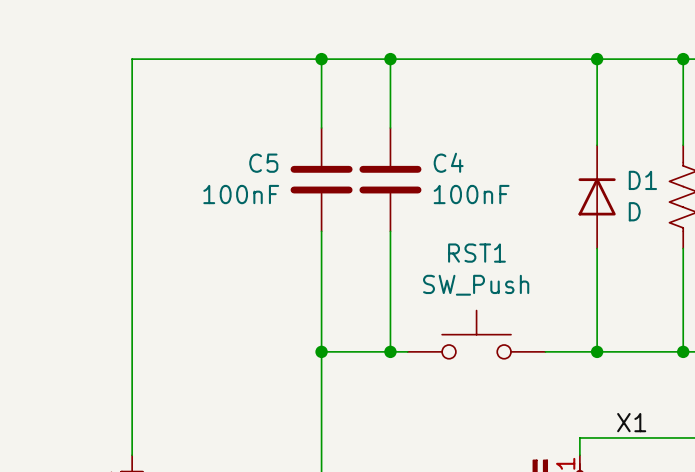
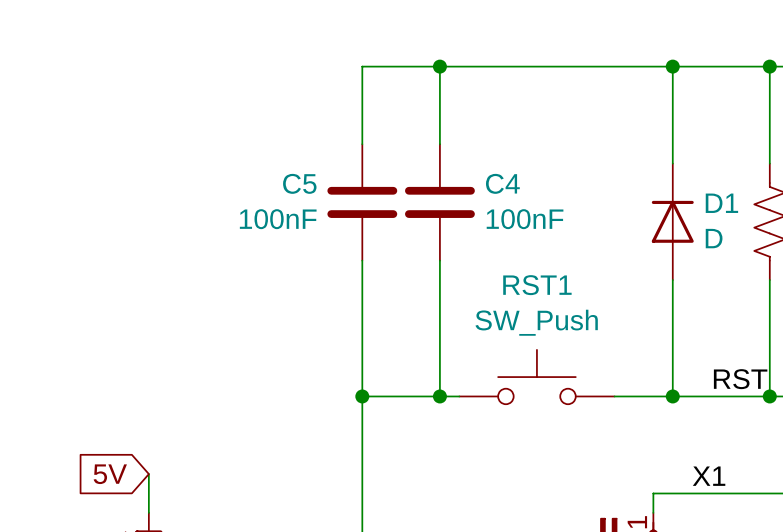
wire: (321, 59) (132, 59) (132, 420) -> none
junction: (321, 59) -> none
label: none -> RST (740, 379)
global label: none -> 5V (110, 474)

